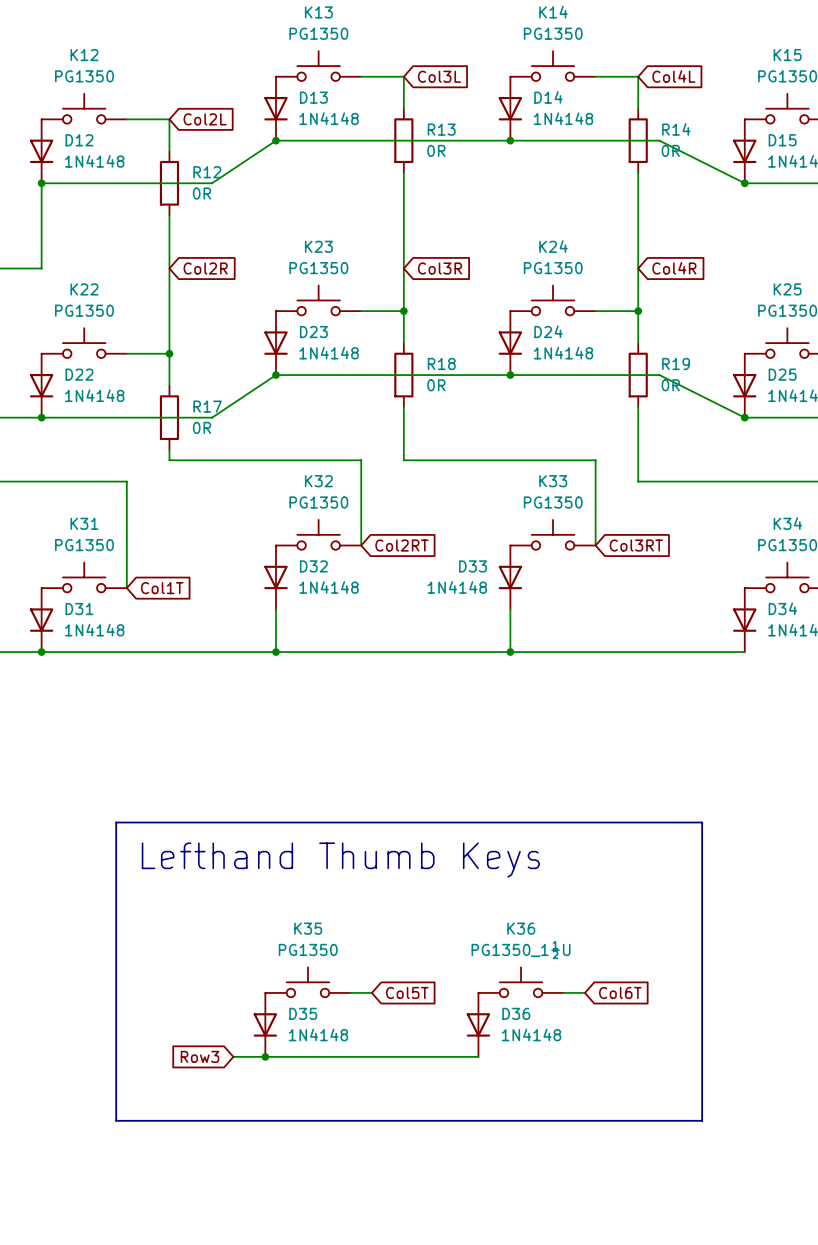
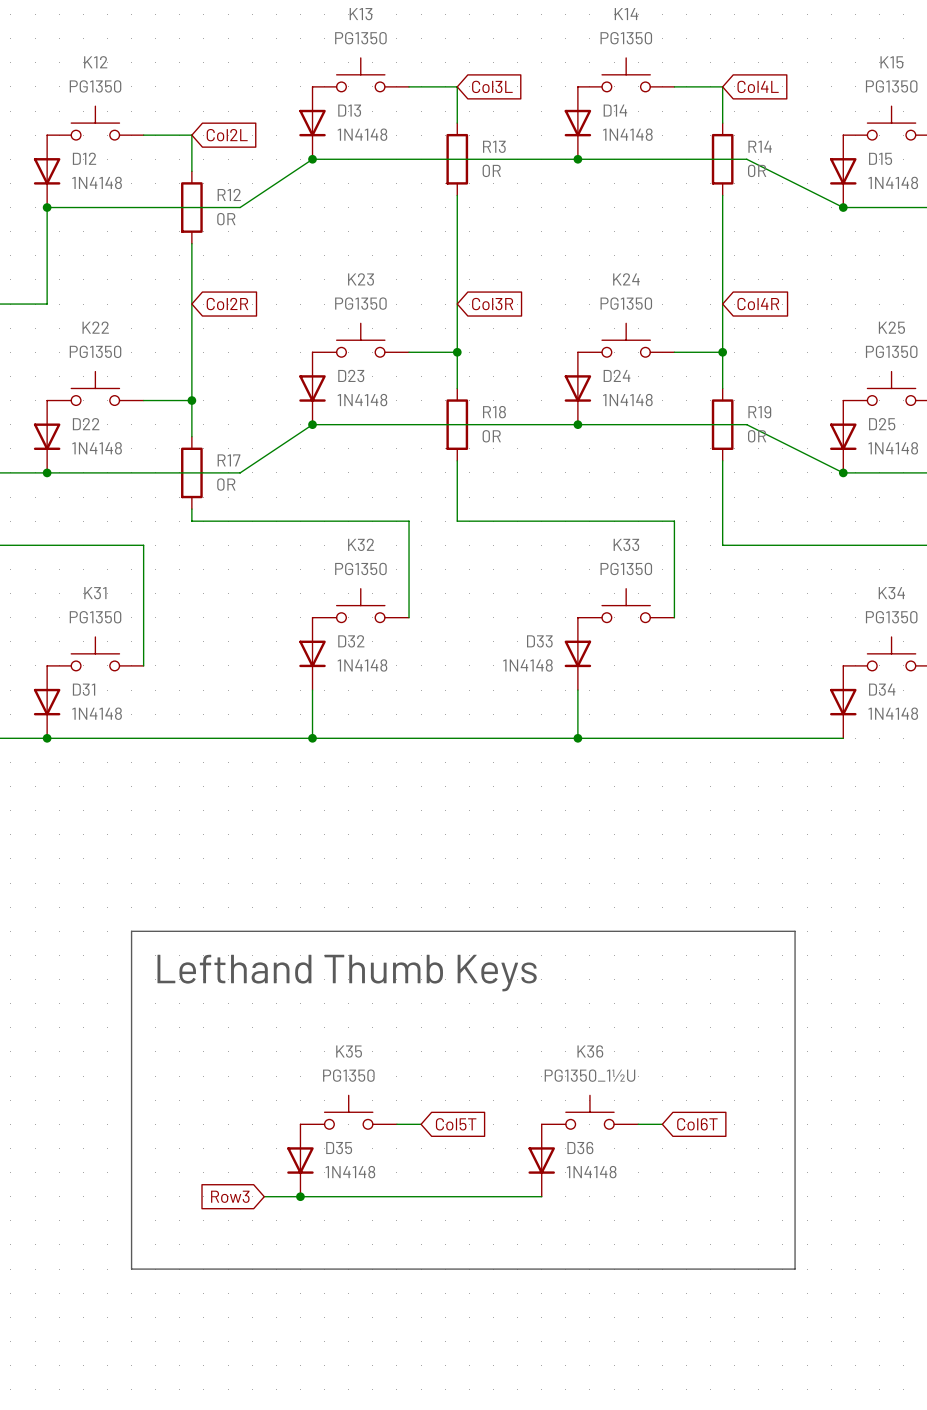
global label: Col2RT (401, 545) -> none
global label: Col3RT (636, 545) -> none
global label: Col1T (162, 588) -> none

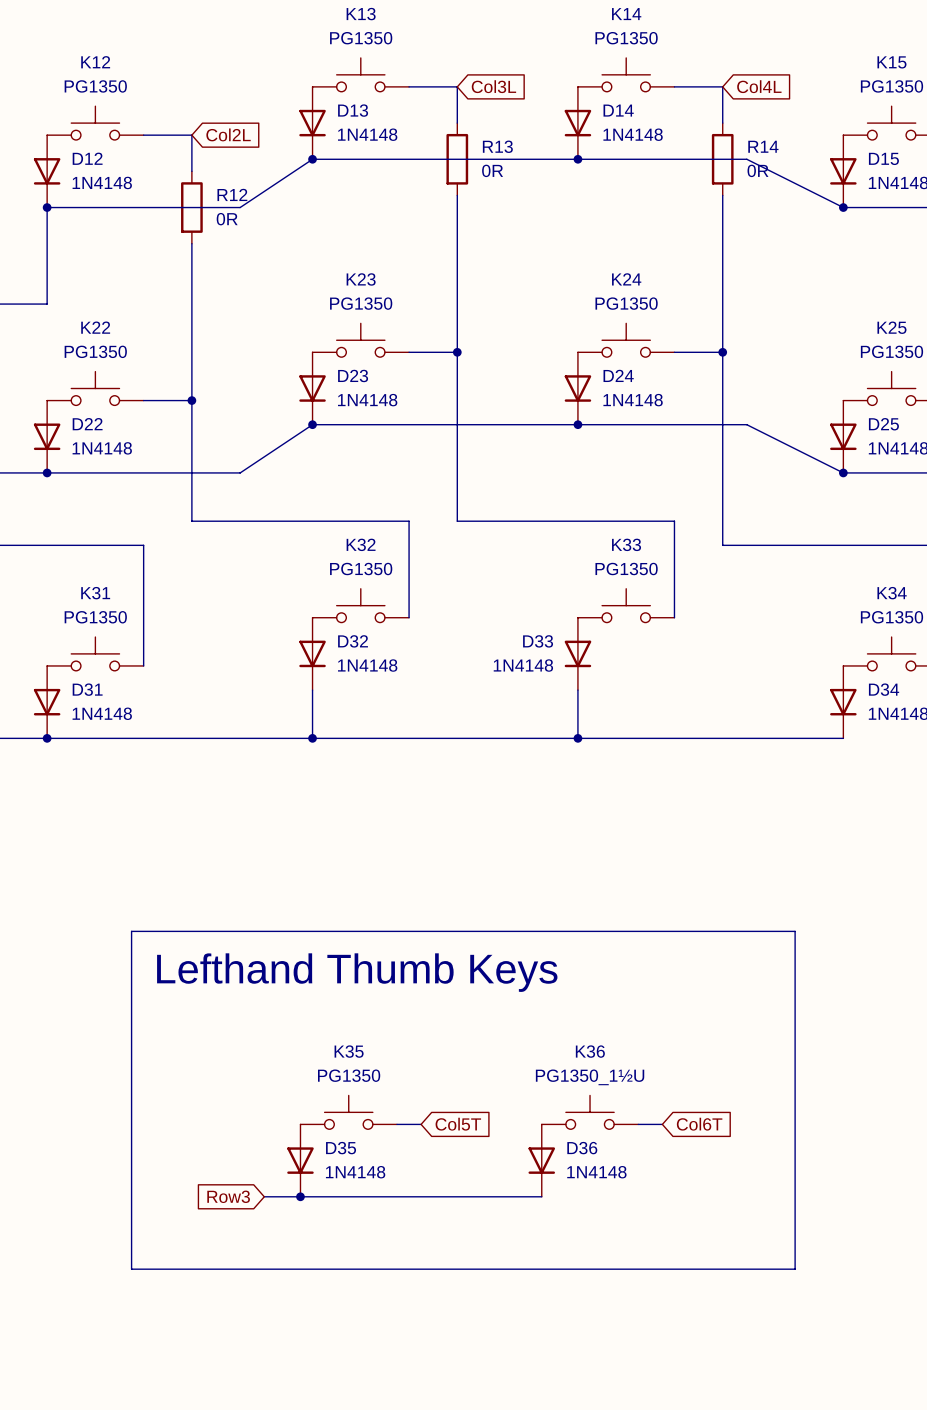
global label: Col2R (227, 304) -> none
global label: Col3R (492, 304) -> none
global label: Col4R (758, 304) -> none
wire: none -> (457, 388) (457, 460)
wire: none -> (722, 388) (722, 460)
R18: 0R (457, 424) -> none
R19: 0R (722, 424) -> none
wire: none -> (191, 436) (191, 509)
R17: 0R (191, 472) -> none

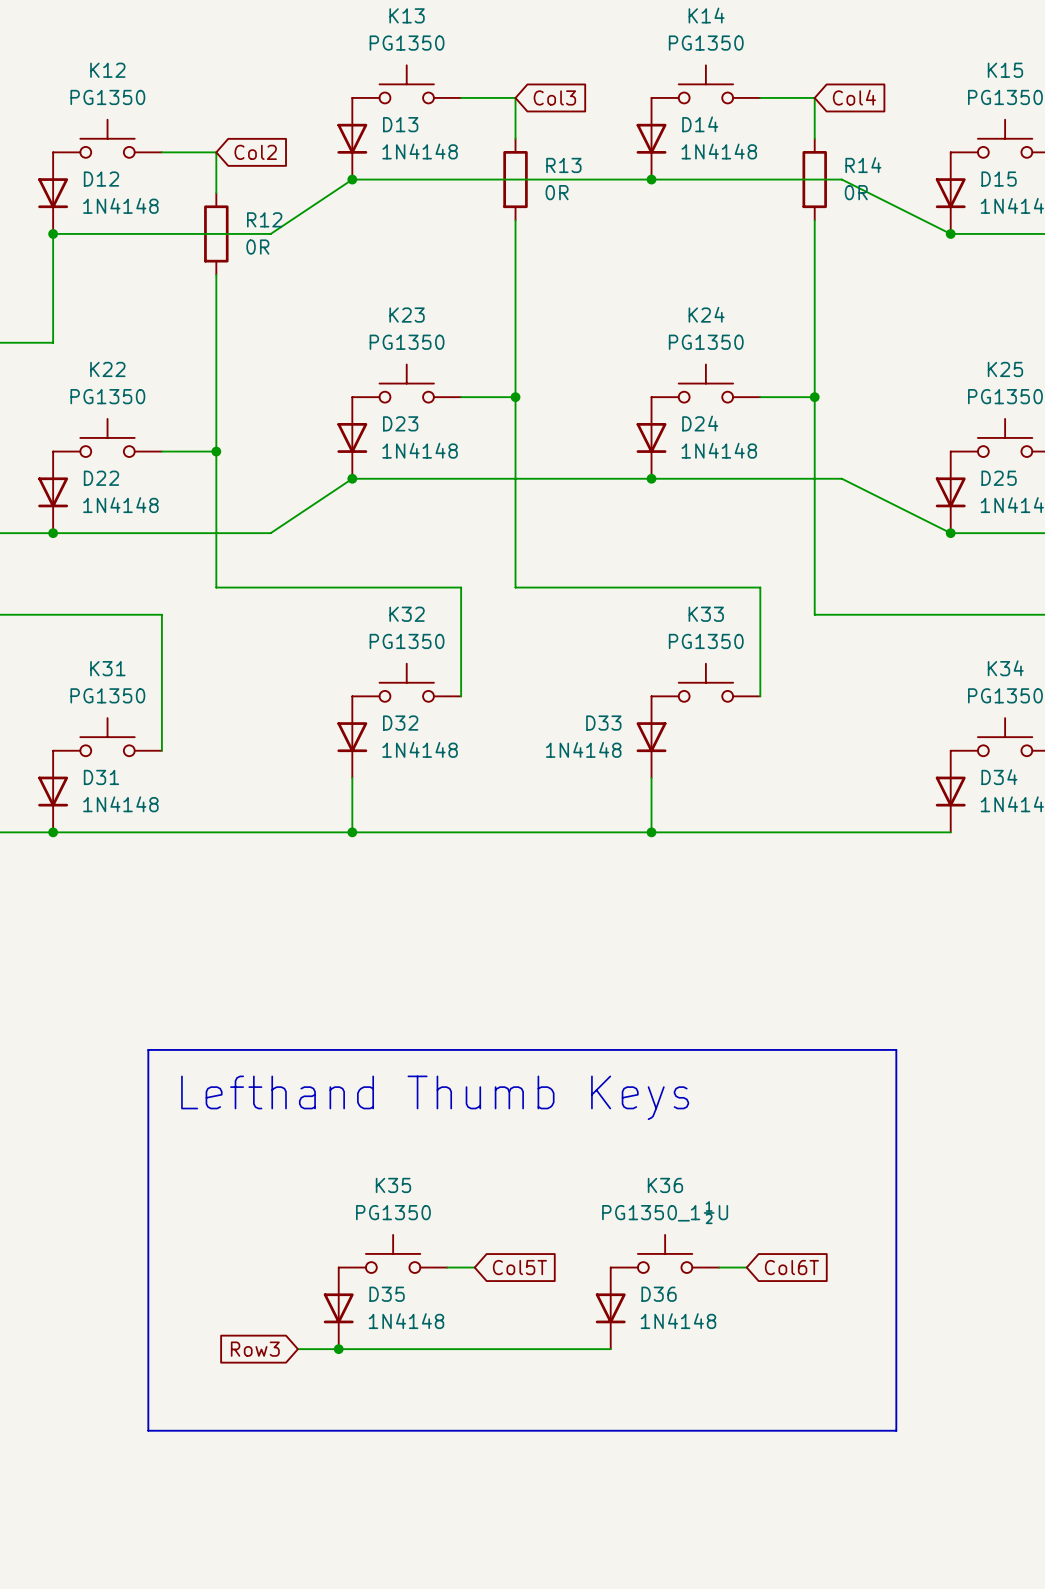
global label: Col3L (493, 86) -> Col3 (554, 97)
global label: Col4L (759, 86) -> Col4 (854, 97)
global label: Col2L (228, 134) -> Col2 (255, 152)

